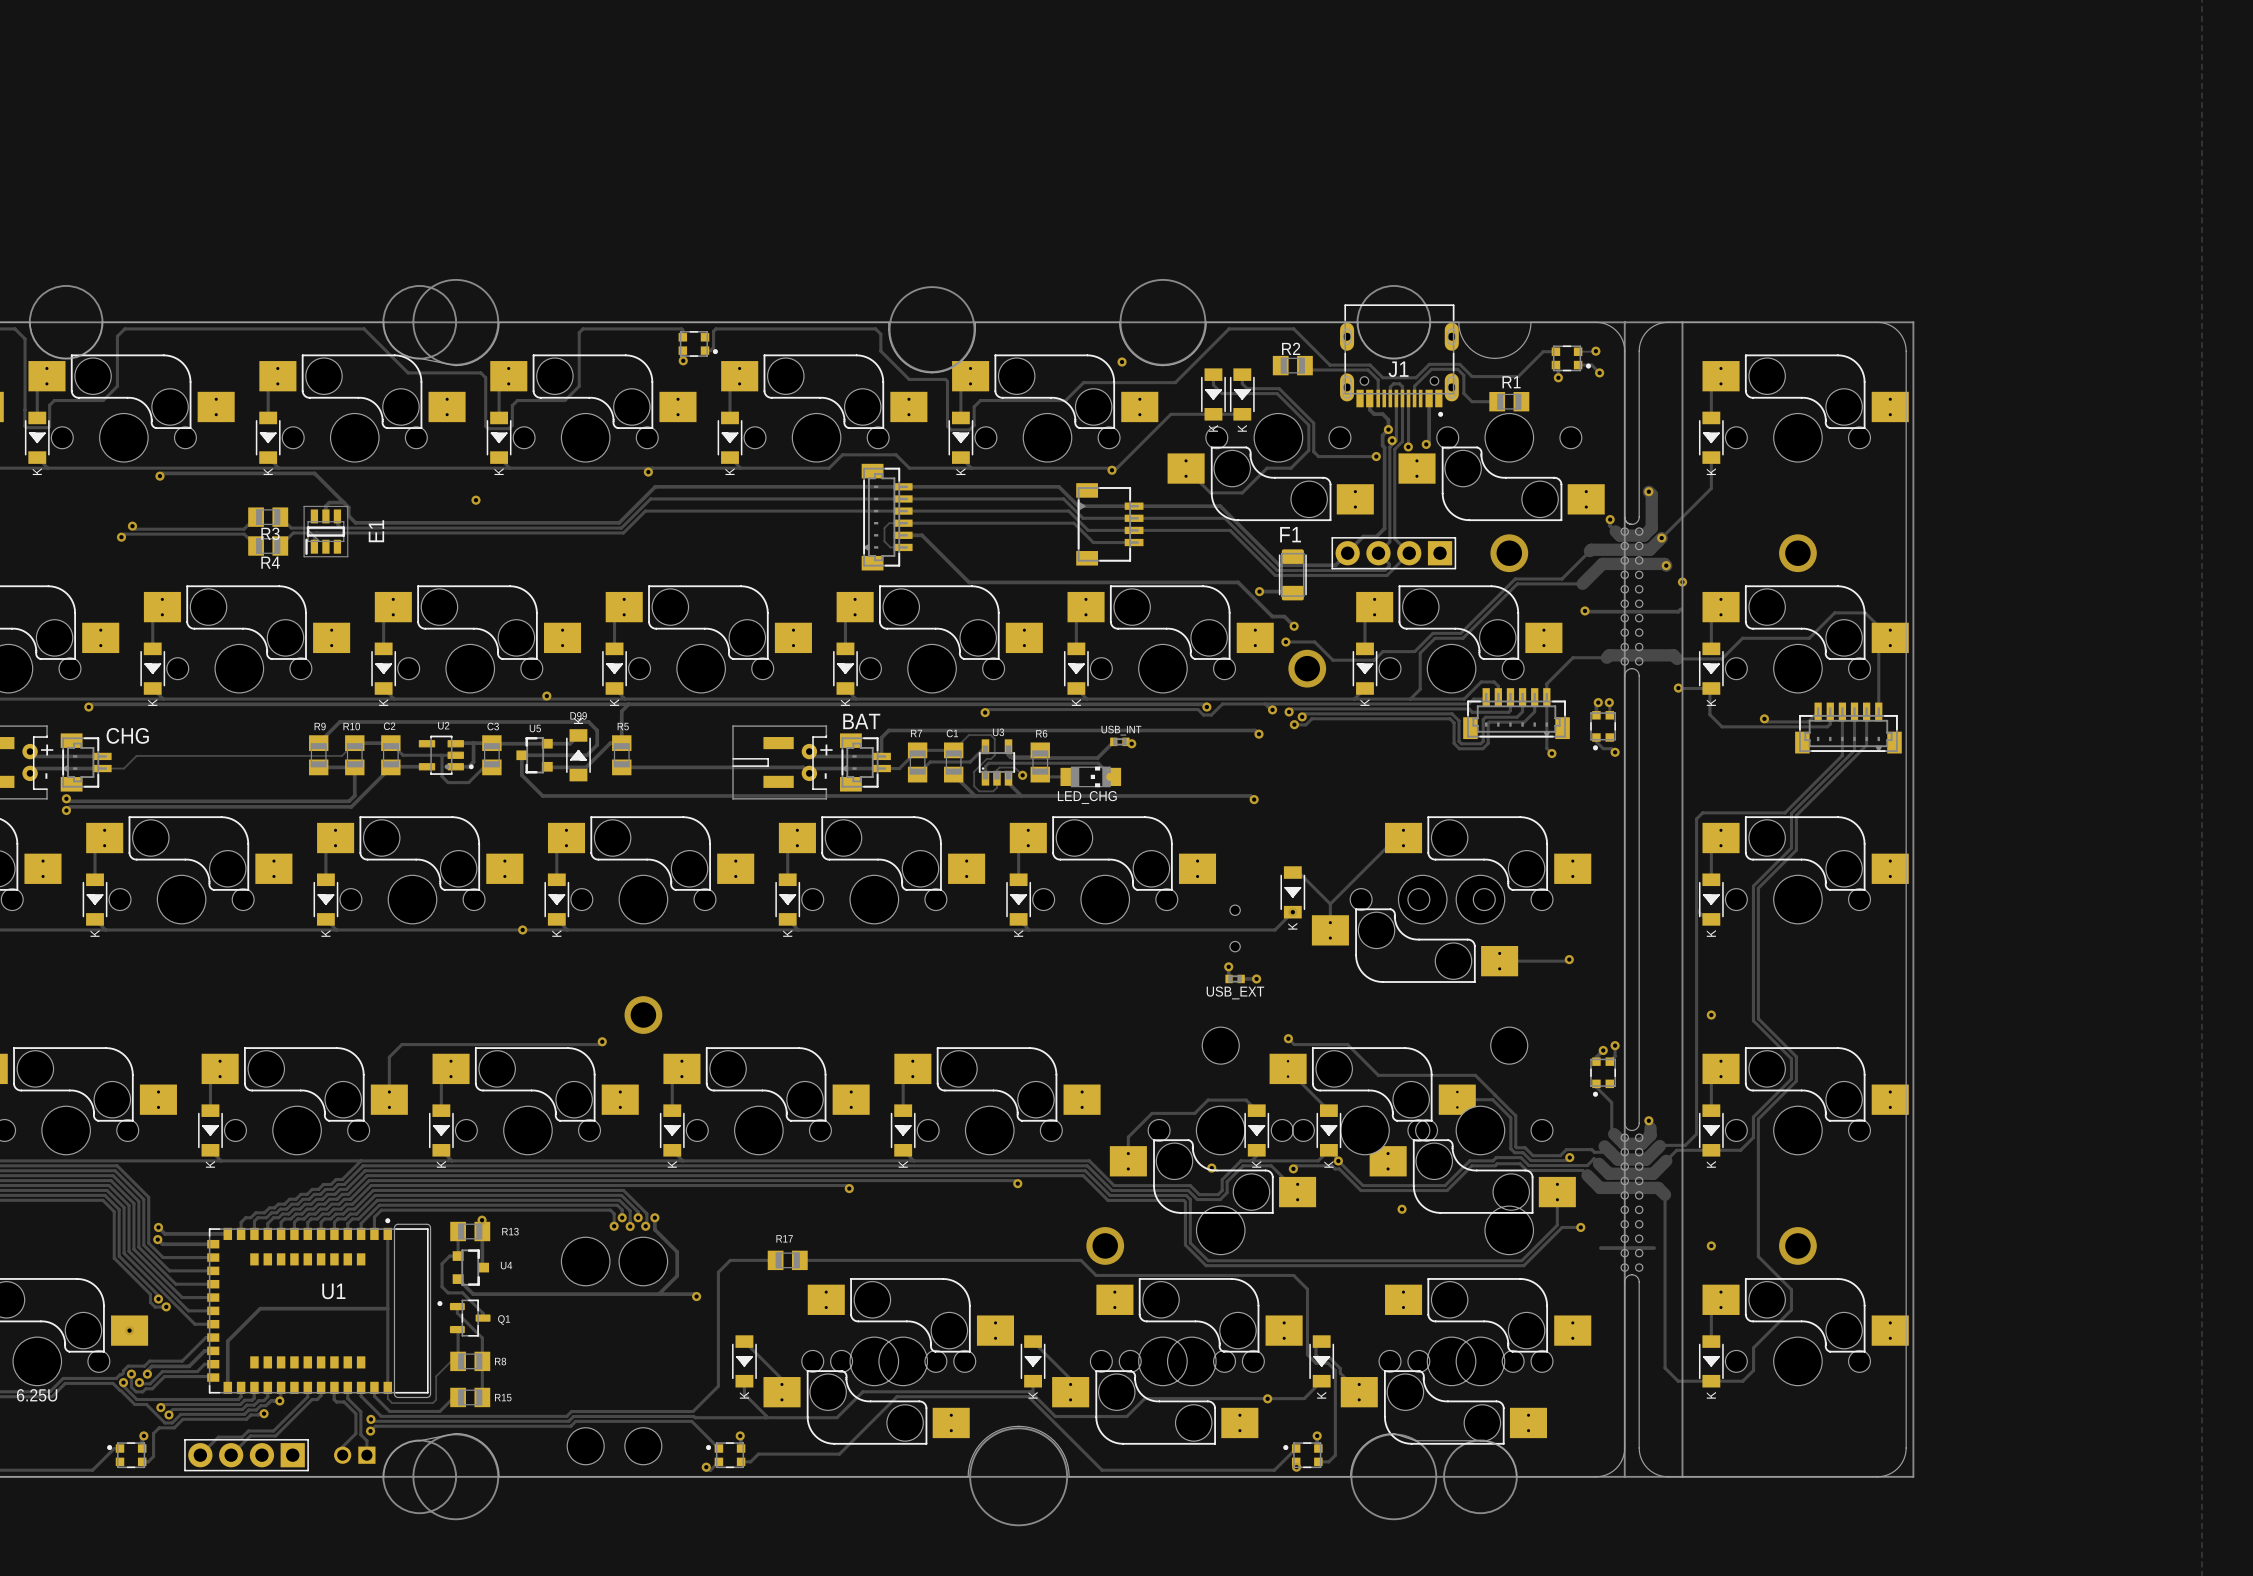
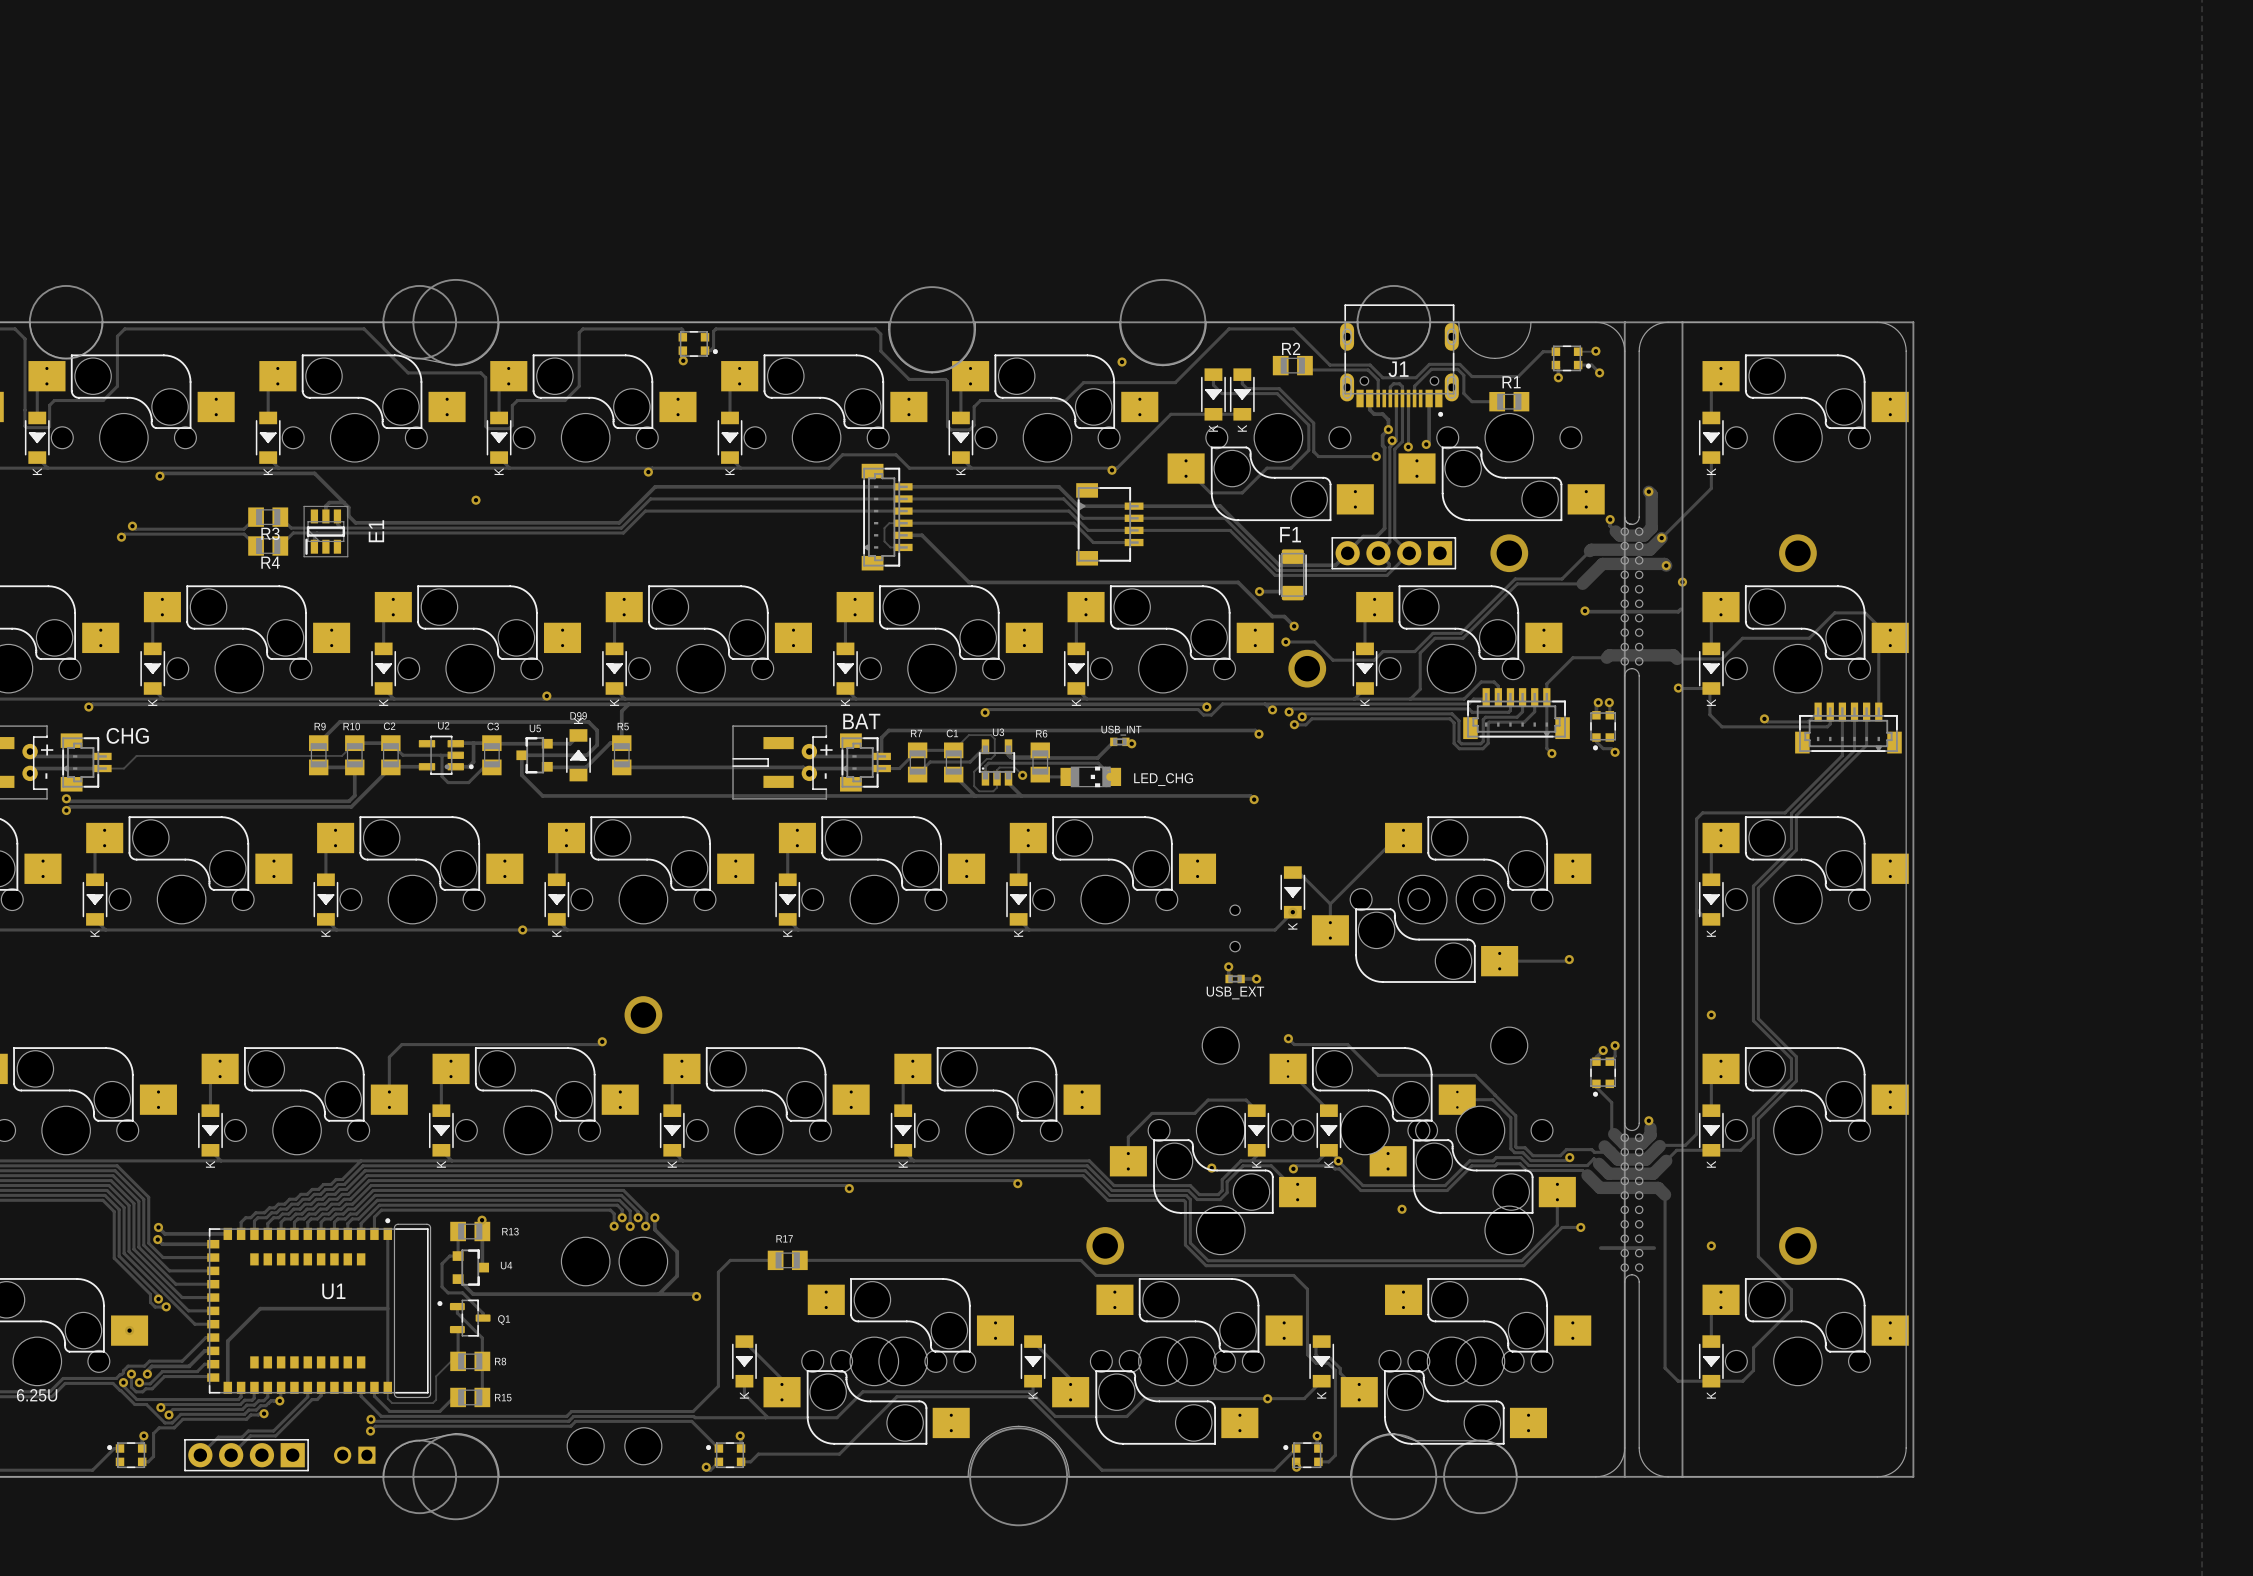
LED_CHG name position: LED_CHG (1087, 797) -> LED_CHG (1163, 779)
track: (334, 1387) (334, 1399) (336, 1401) (344, 1401) (355, 1413) (355, 1433) (342, 1446) (342, 1455) -> none
track: (347, 1387) (347, 1398) (360, 1411) (360, 1434) (366, 1440) (366, 1455) -> none

